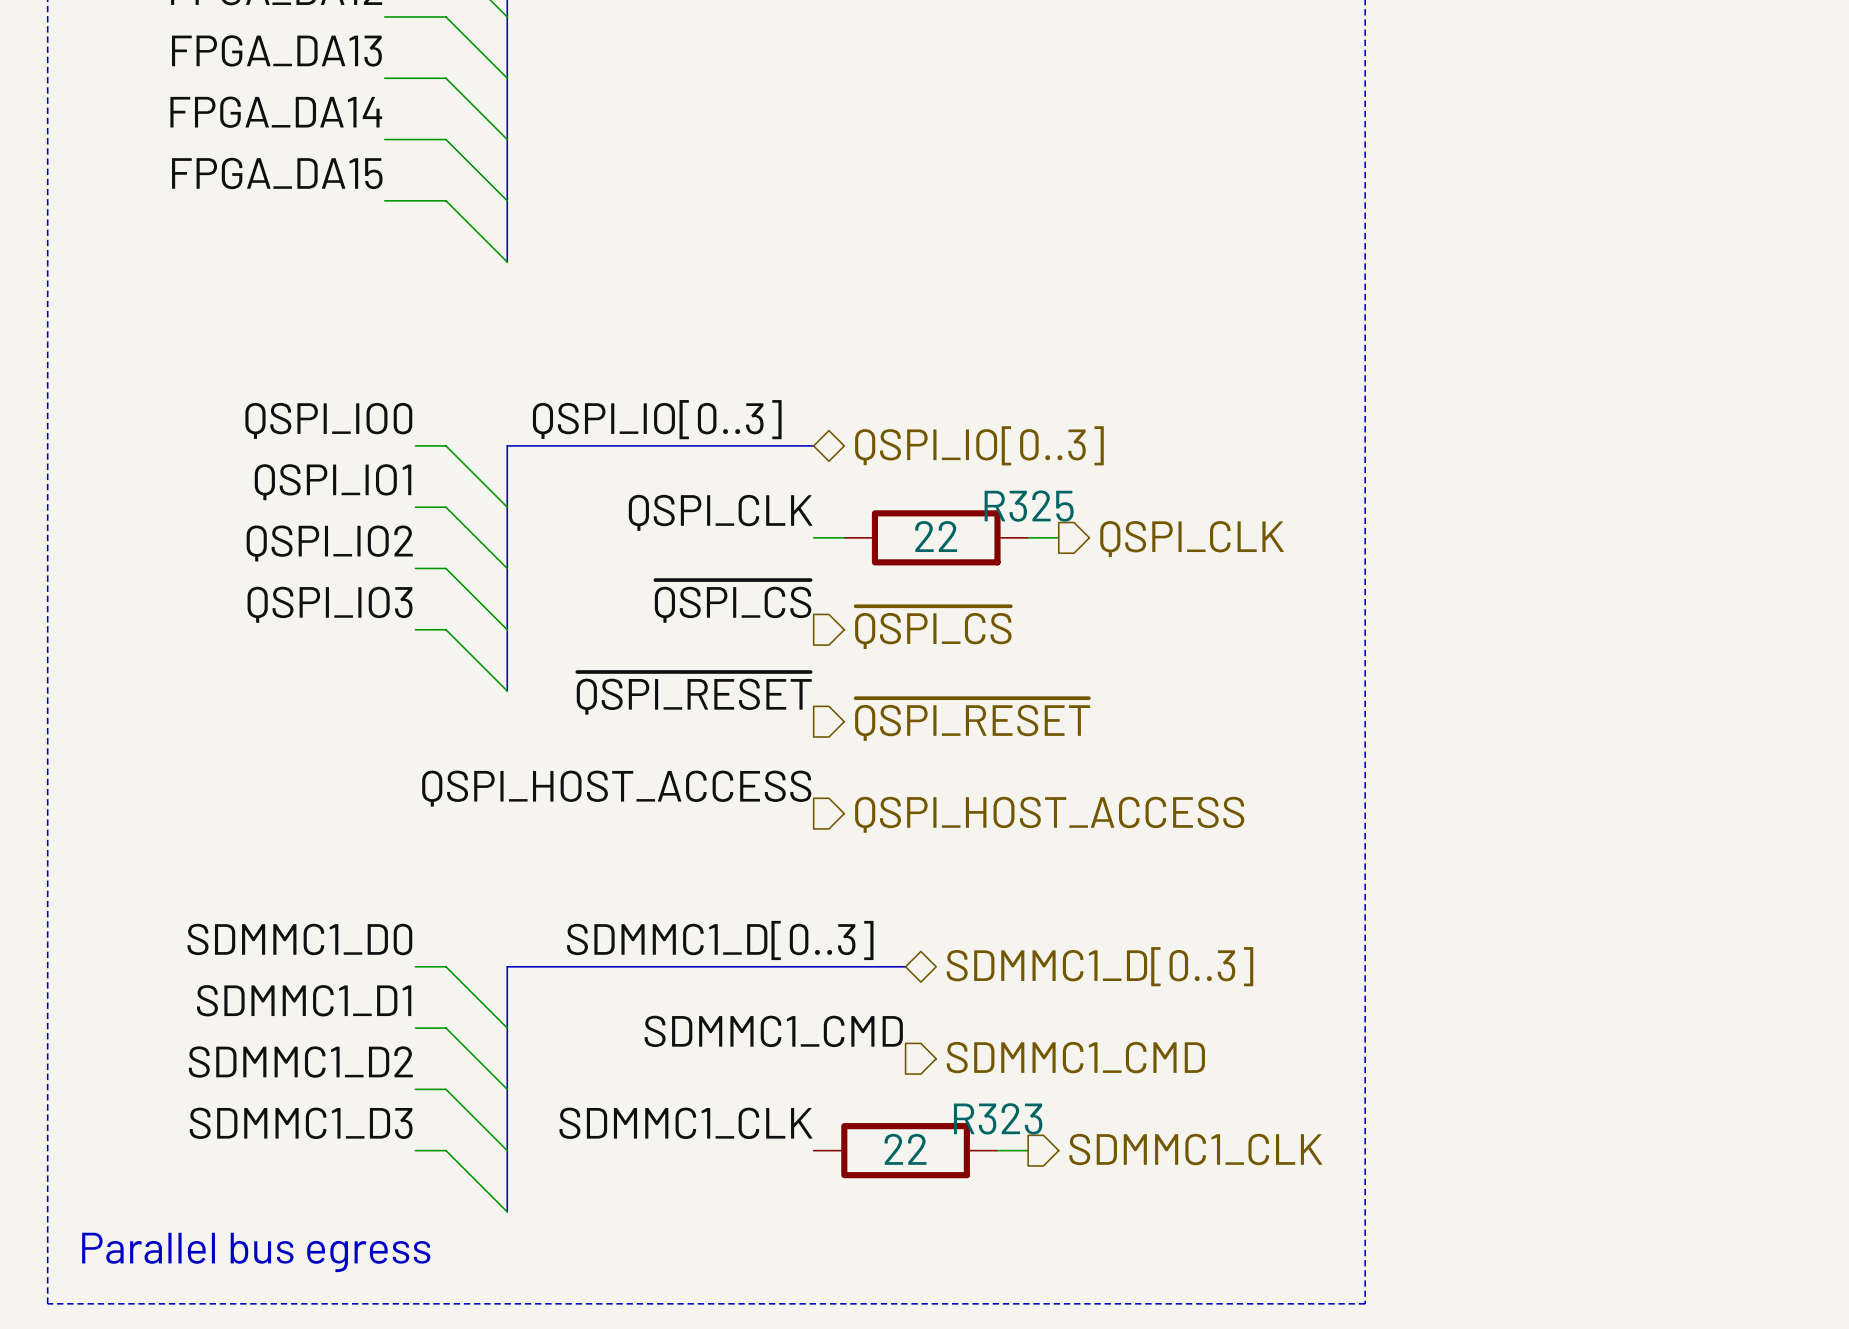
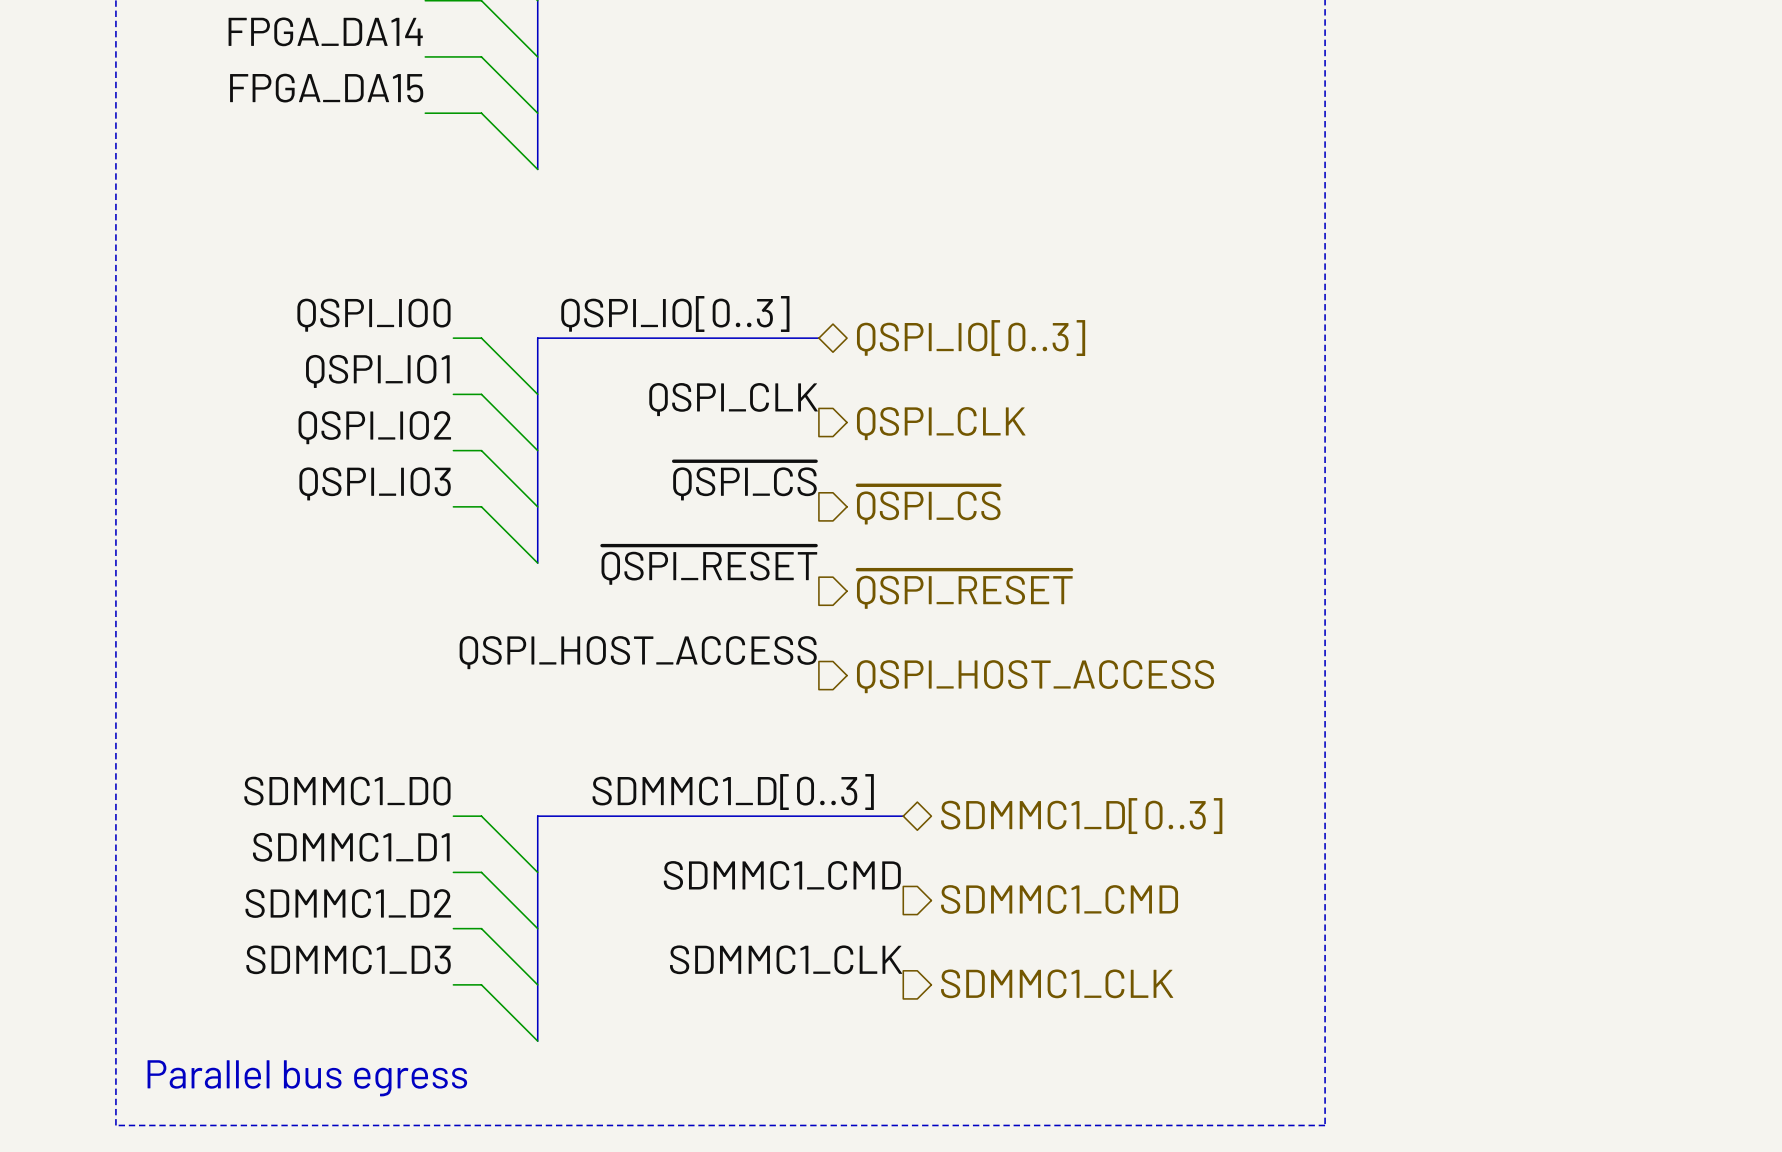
wire: (813, 537) (844, 537) -> none
R325: 22 (936, 537) -> none
wire: (1028, 537) (1058, 537) -> none
hierarchical label position: QSPI_CLK (1192, 539) -> QSPI_CLK (941, 423)
label position: SDMMC1_CLK (685, 1123) -> SDMMC1_CLK (786, 959)
hierarchical label position: SDMMC1_CLK (1195, 1149) -> SDMMC1_CLK (1057, 983)
R323: 22 (905, 1150) -> none
wire: (997, 1150) (1028, 1150) -> none

